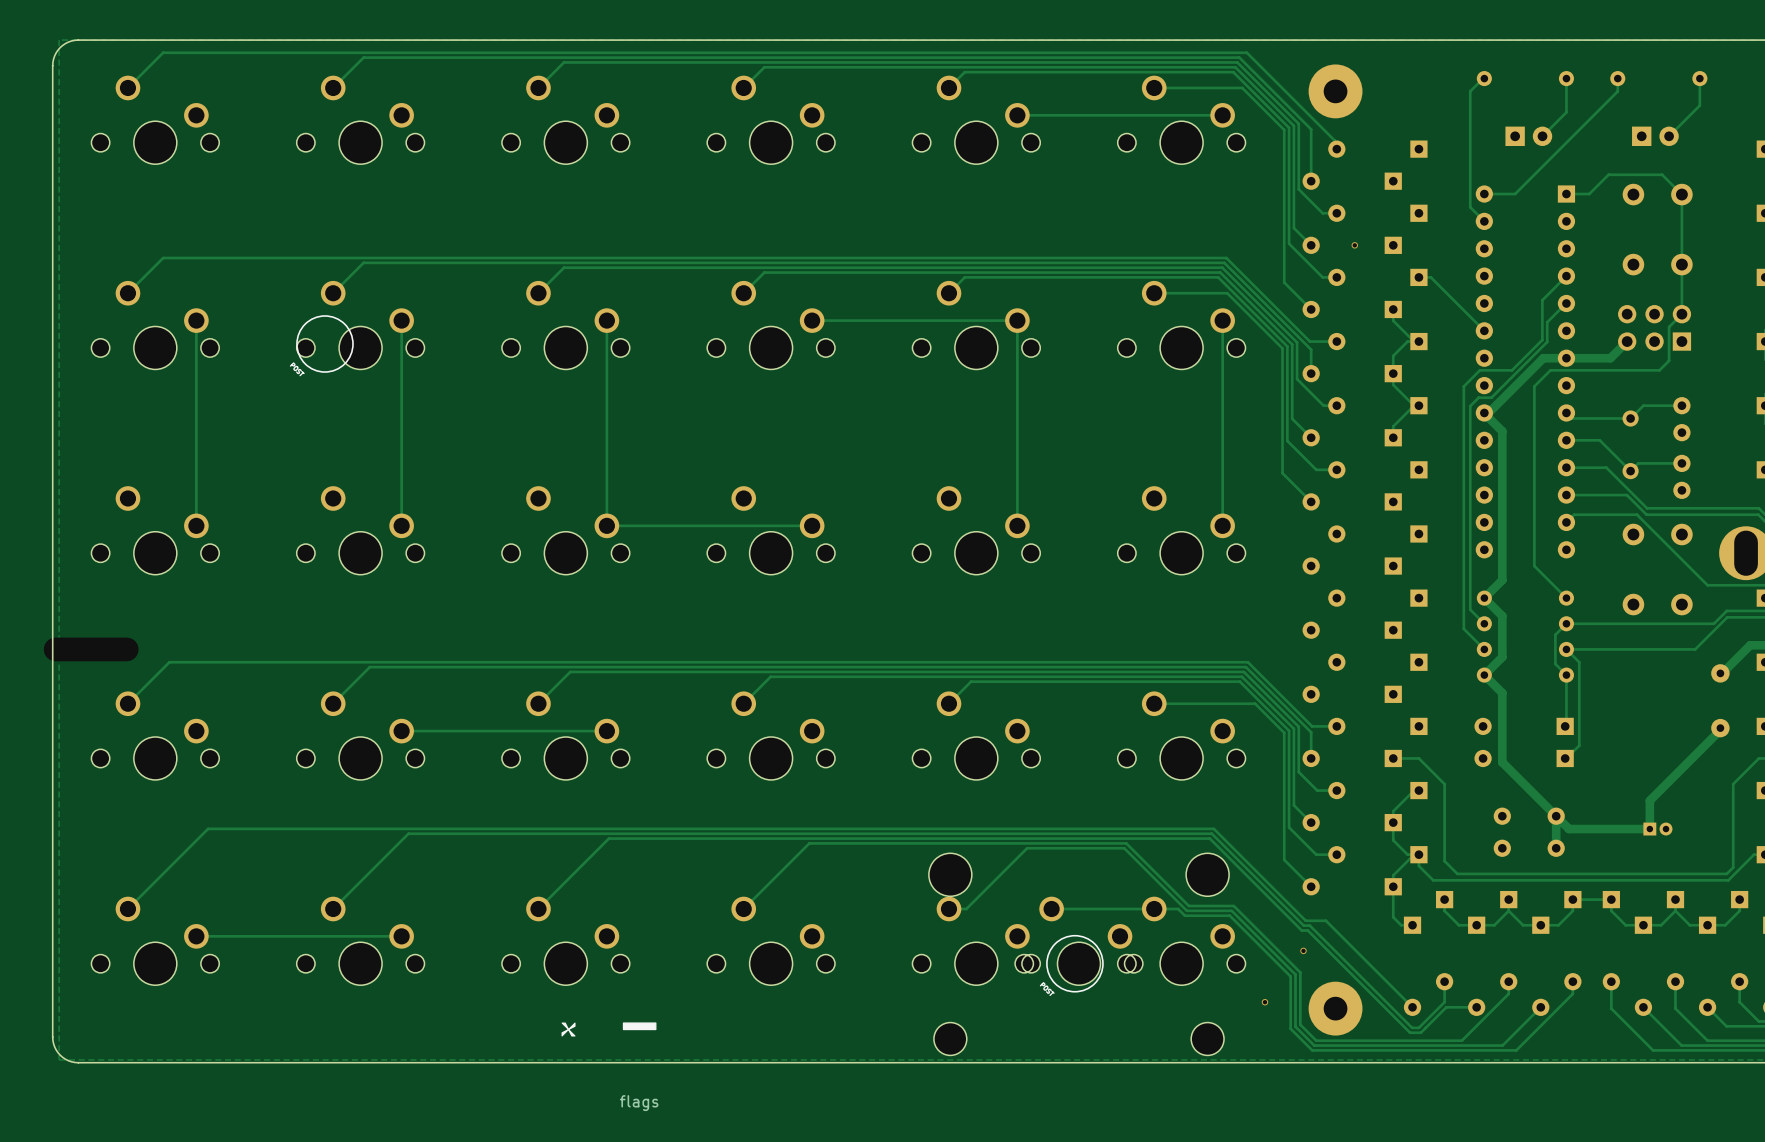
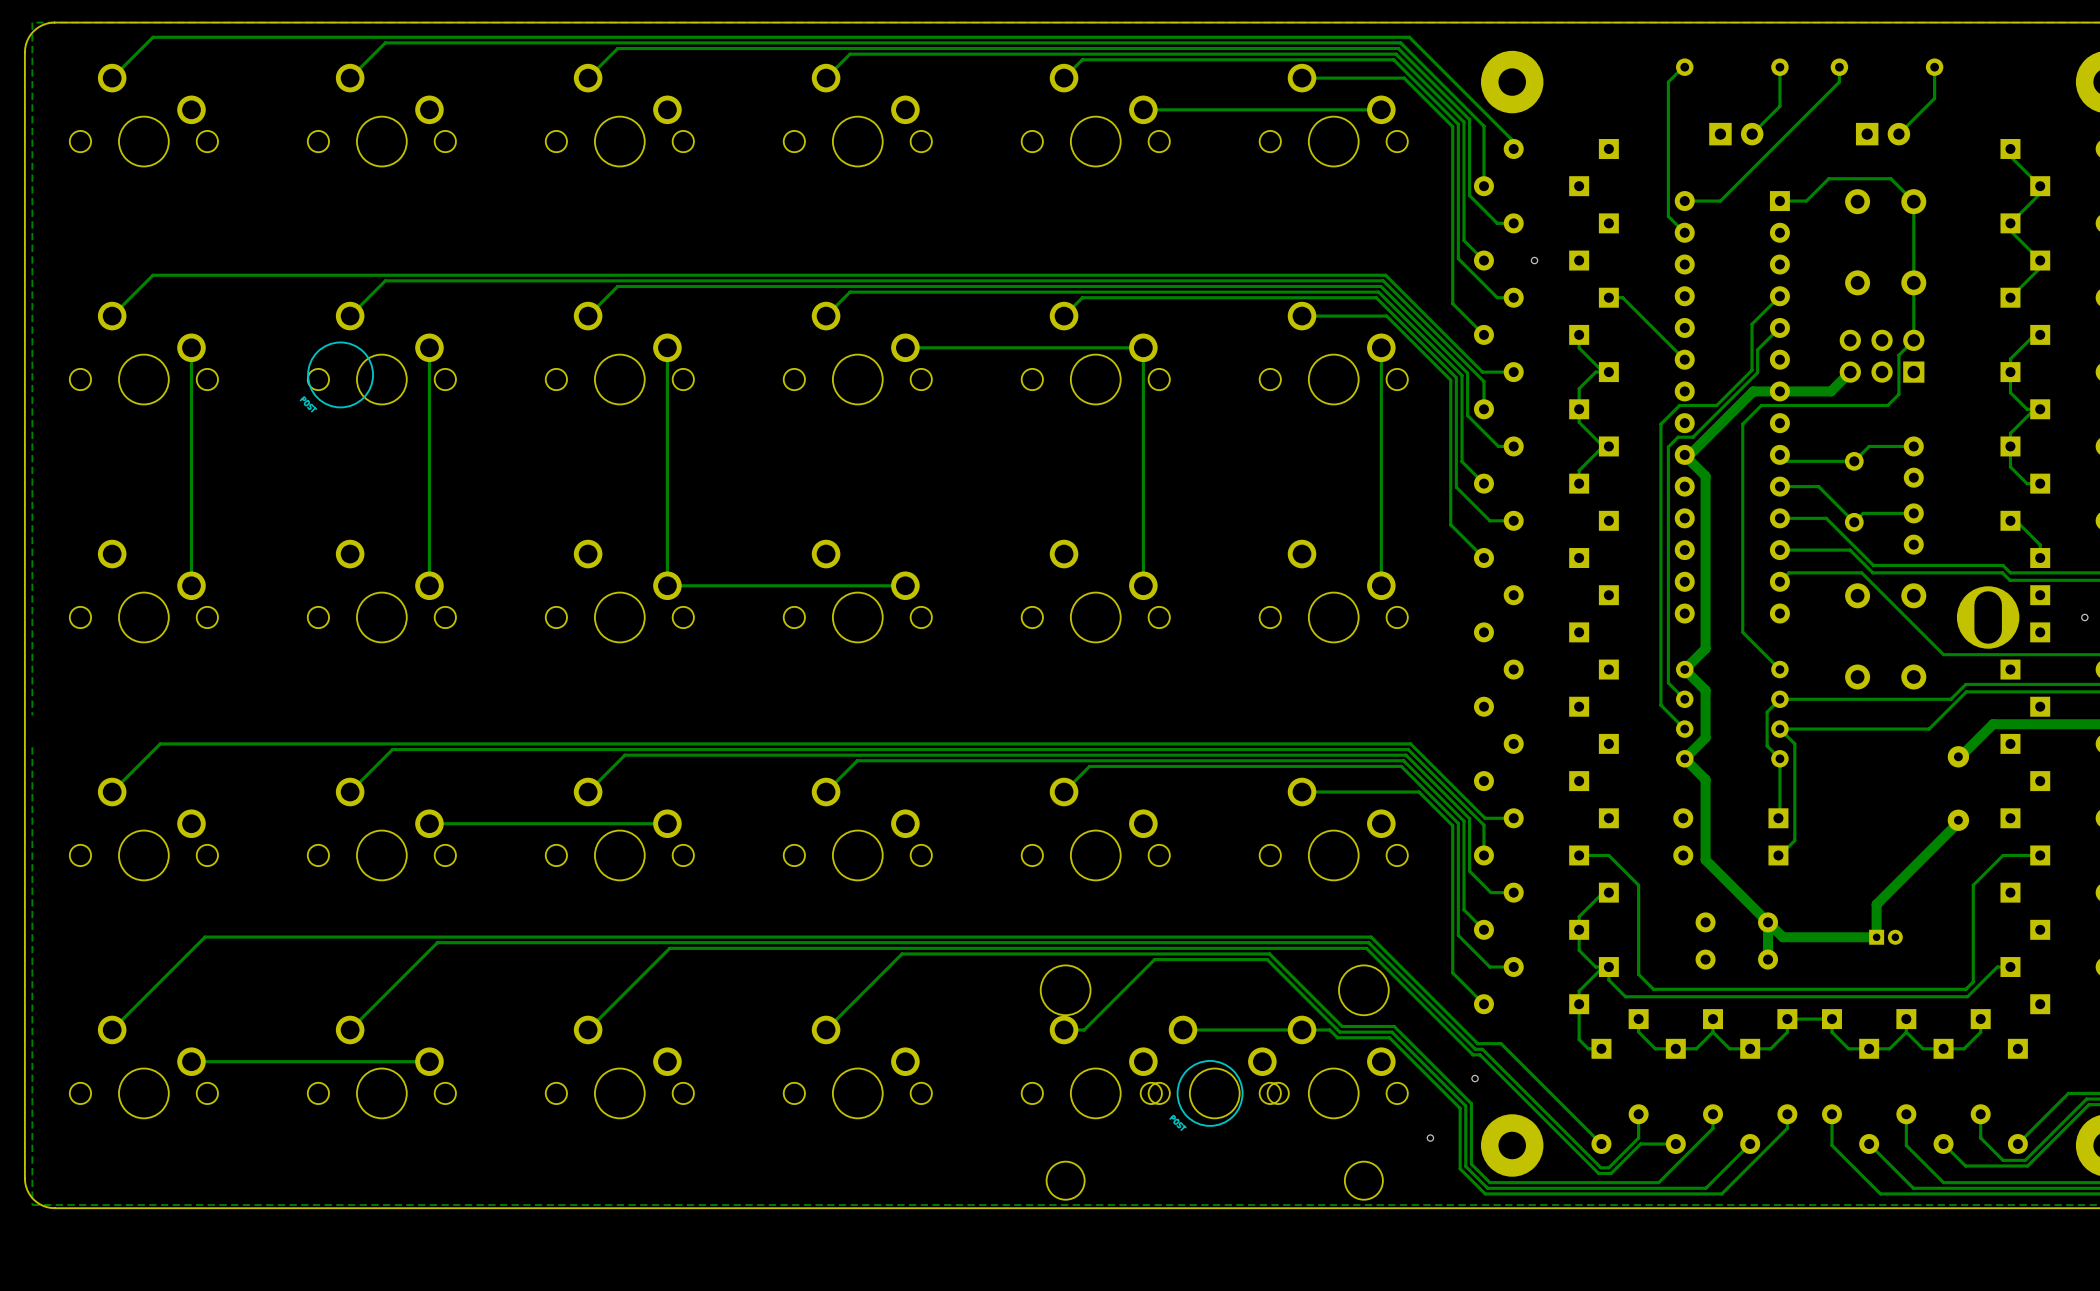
drawing: [561, 1022, 657, 1037] -> none

